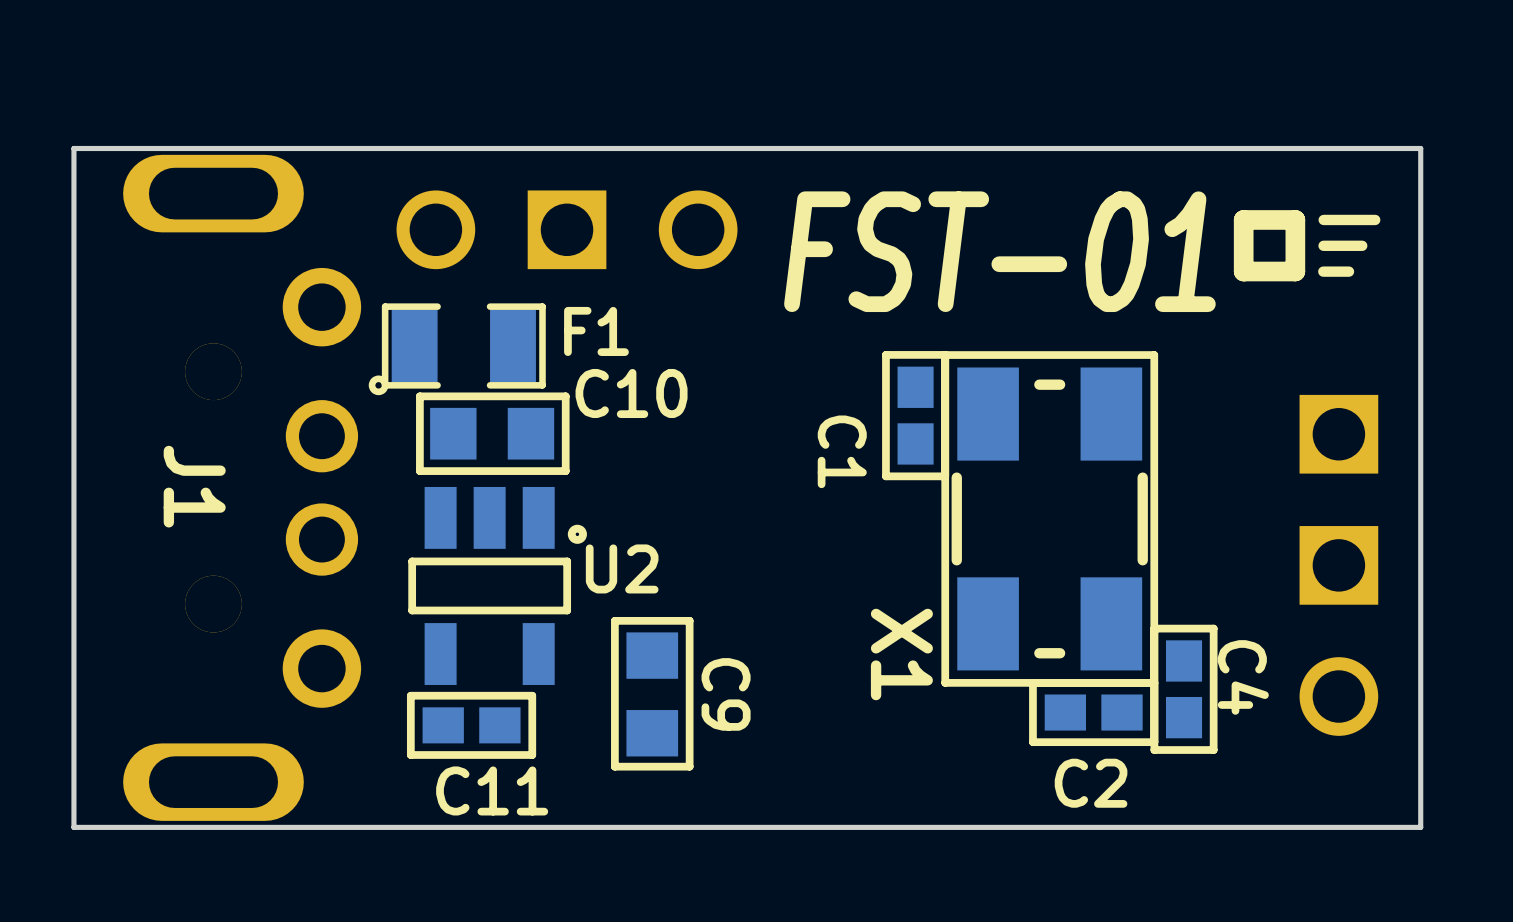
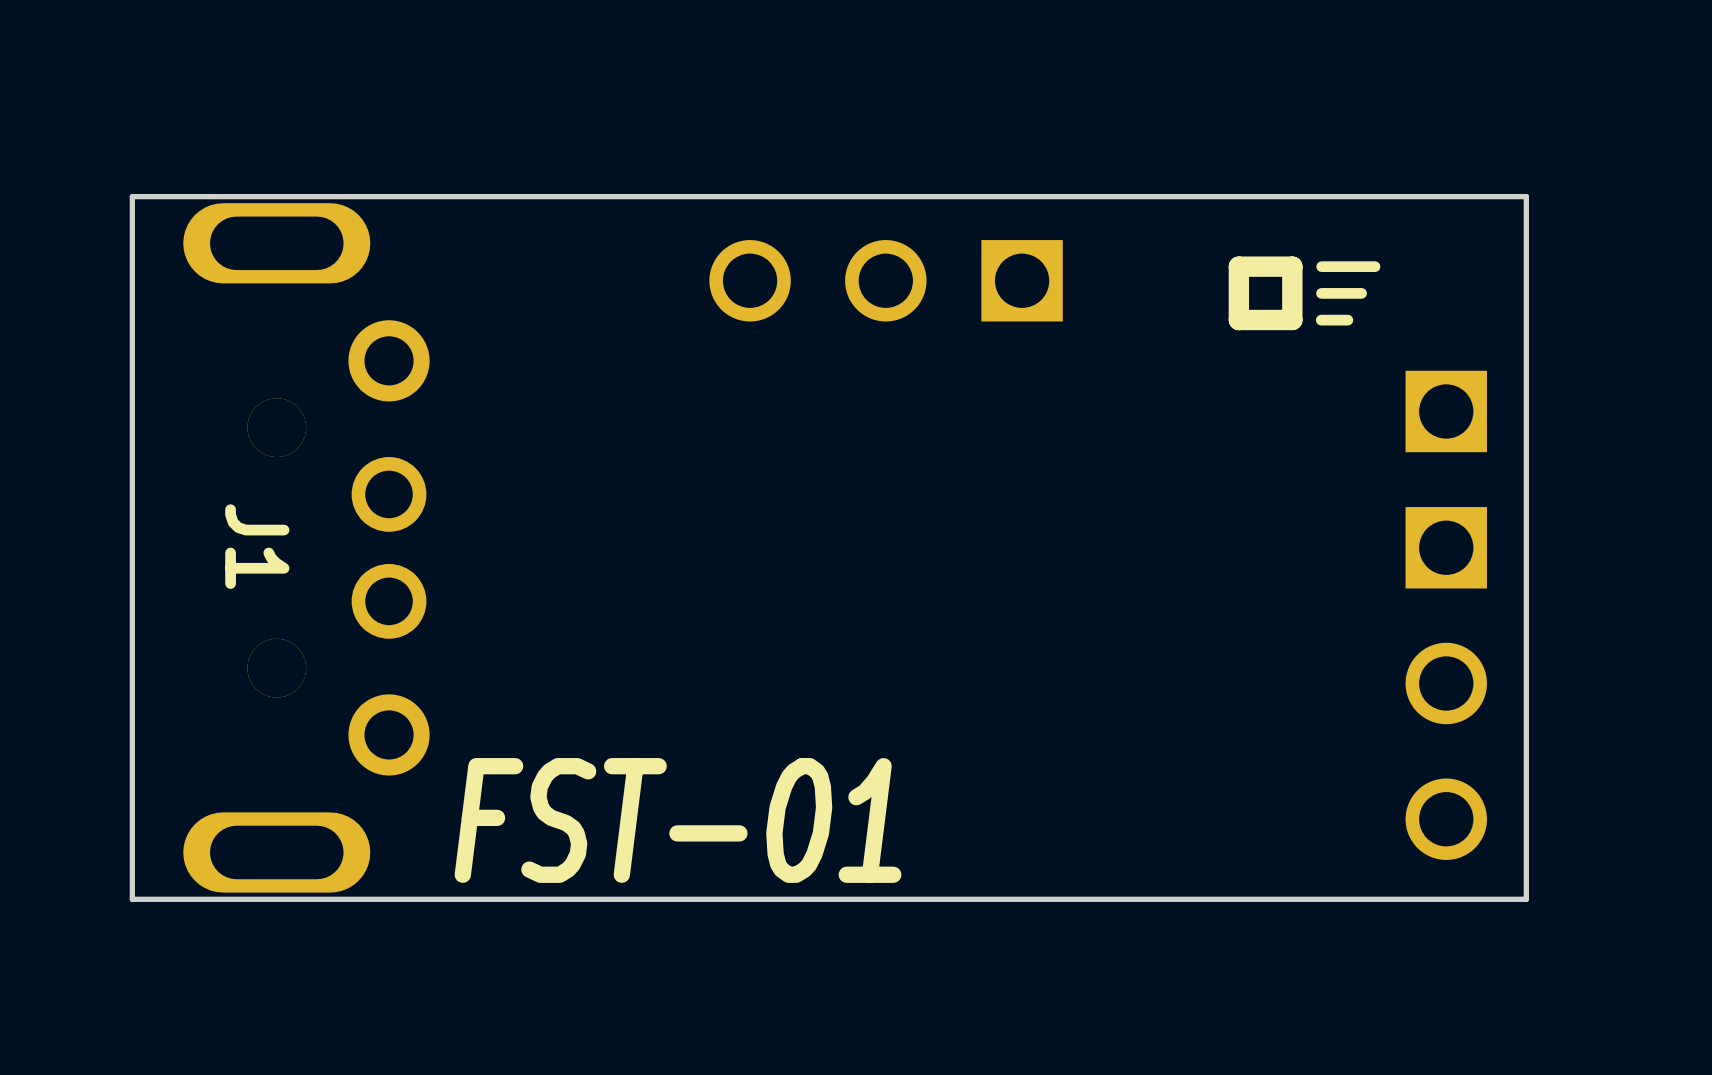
line: (1295, 219) (1295, 271) (1243, 271) (1243, 219) (1295, 219) -> none
line: (1375, 219) (1323, 219) -> (1375, 266) (1321, 266)
part: (567, 229) -> none
part: none -> (886, 280)
line: (1362, 245) (1323, 245) -> (1361, 293) (1321, 293)
text position: FST-01 (999, 251) -> FST-01 (678, 820)
line: none -> (1238, 320) (1292, 320) (1292, 266) (1238, 266) (1238, 320)
line: (1348, 271) (1323, 271) -> (1347, 320) (1321, 320)
F1: (457, 349) -> none
part footprint: [1299, 394, 1379, 736] -> [1405, 370, 1487, 860]
C1: (915, 415) -> none
C10: (492, 433) -> none
X1: (1049, 518) -> none
U2: (497, 585) -> none
C4: (1184, 689) -> none
C9: (652, 693) -> none
C2: (1093, 712) -> none
C11: (471, 725) -> none

